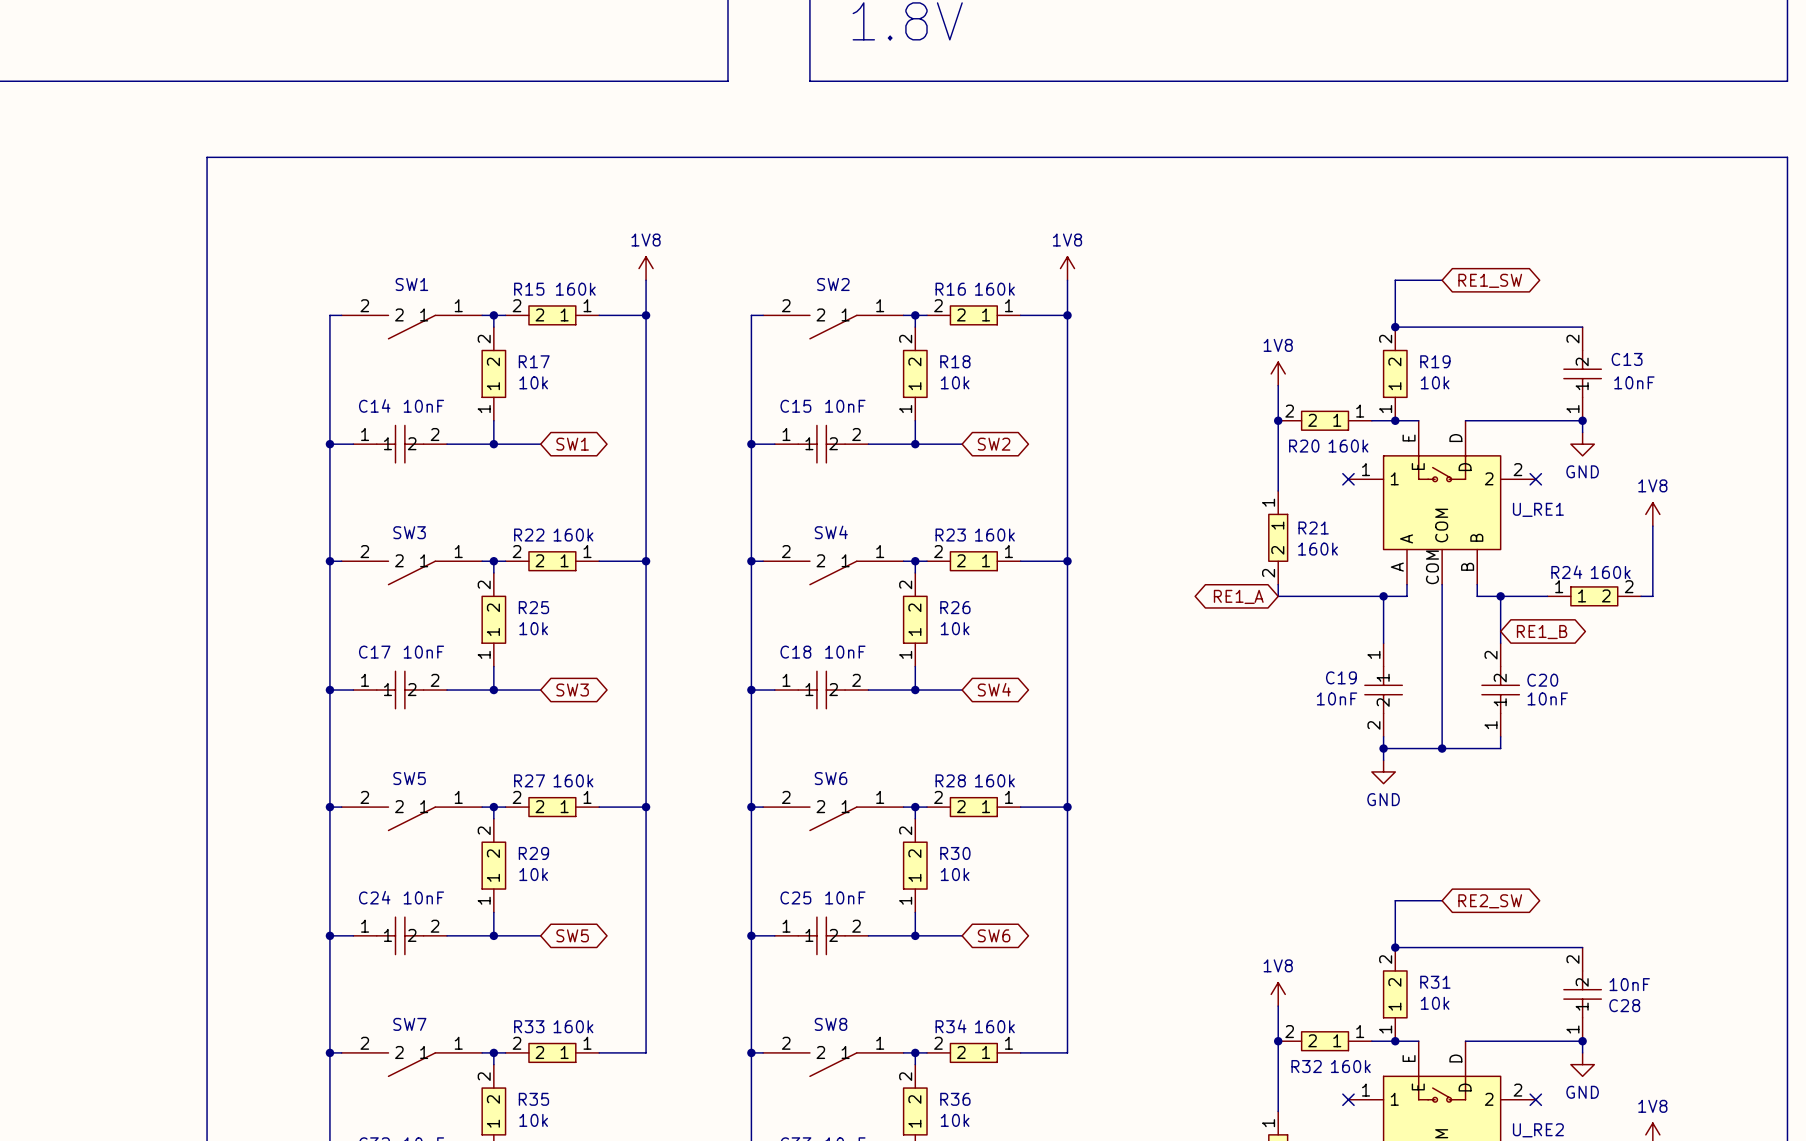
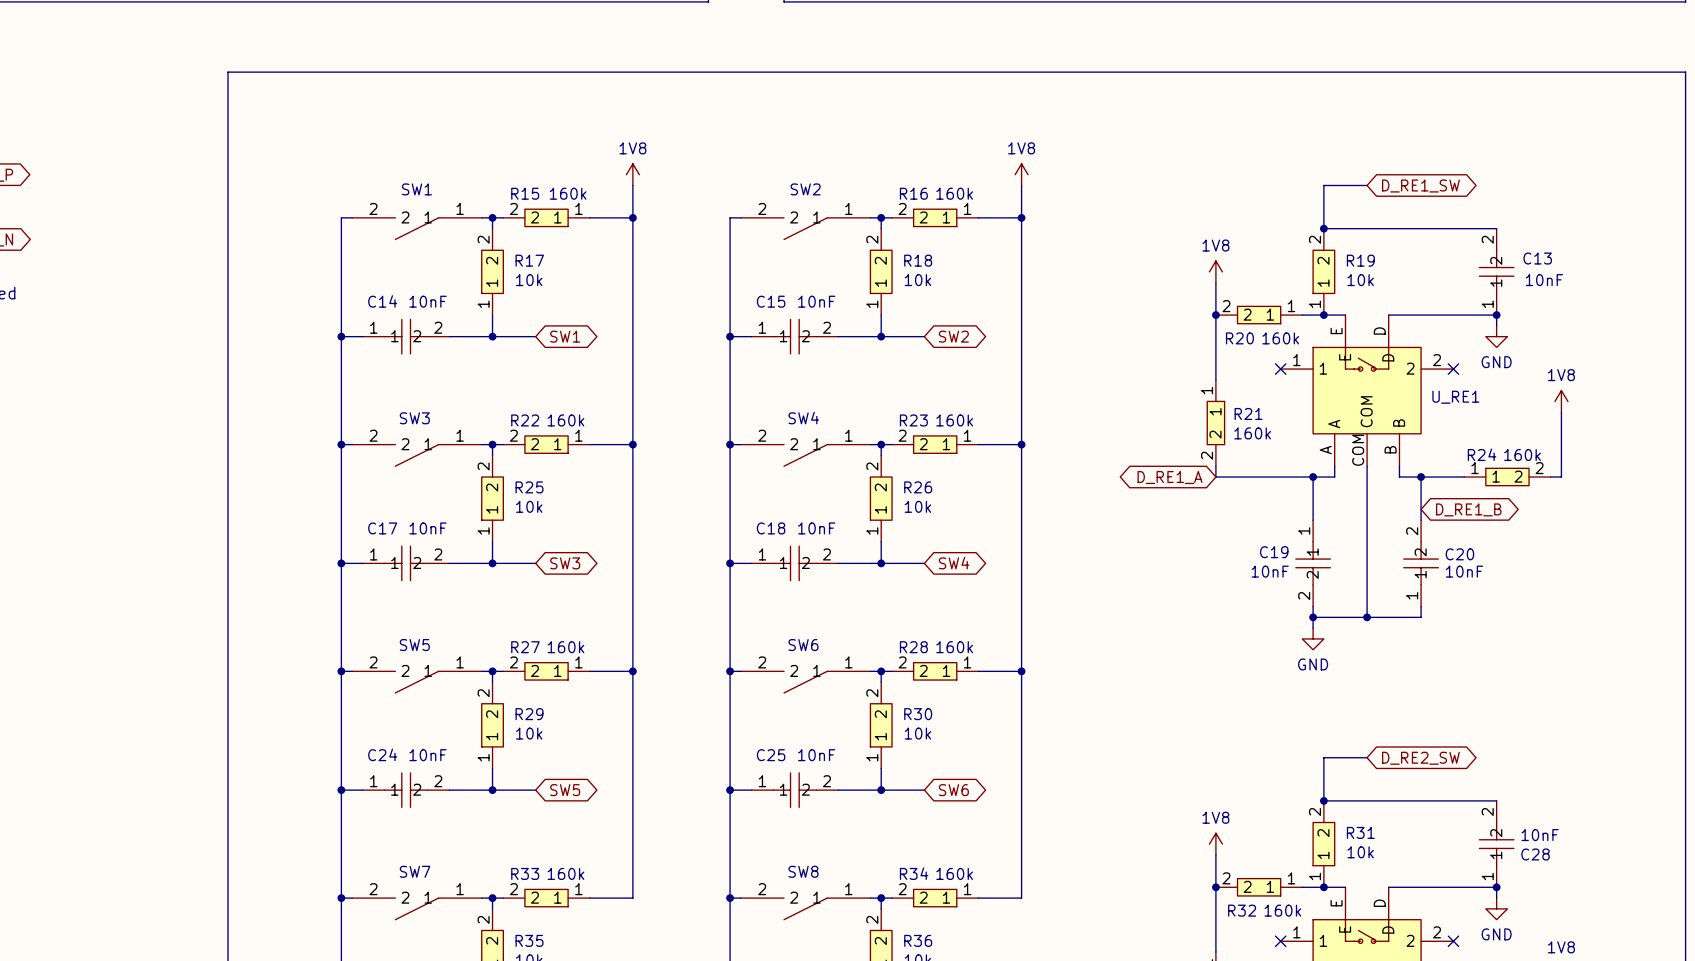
global label: RE1_SW (1490, 280) -> D_RE1_SW (1420, 186)
global label: RE1_A (1238, 596) -> D_RE1_A (1170, 477)
global label: RE1_B (1542, 632) -> D_RE1_B (1468, 509)
global label: RE2_SW (1490, 901) -> D_RE2_SW (1420, 758)

